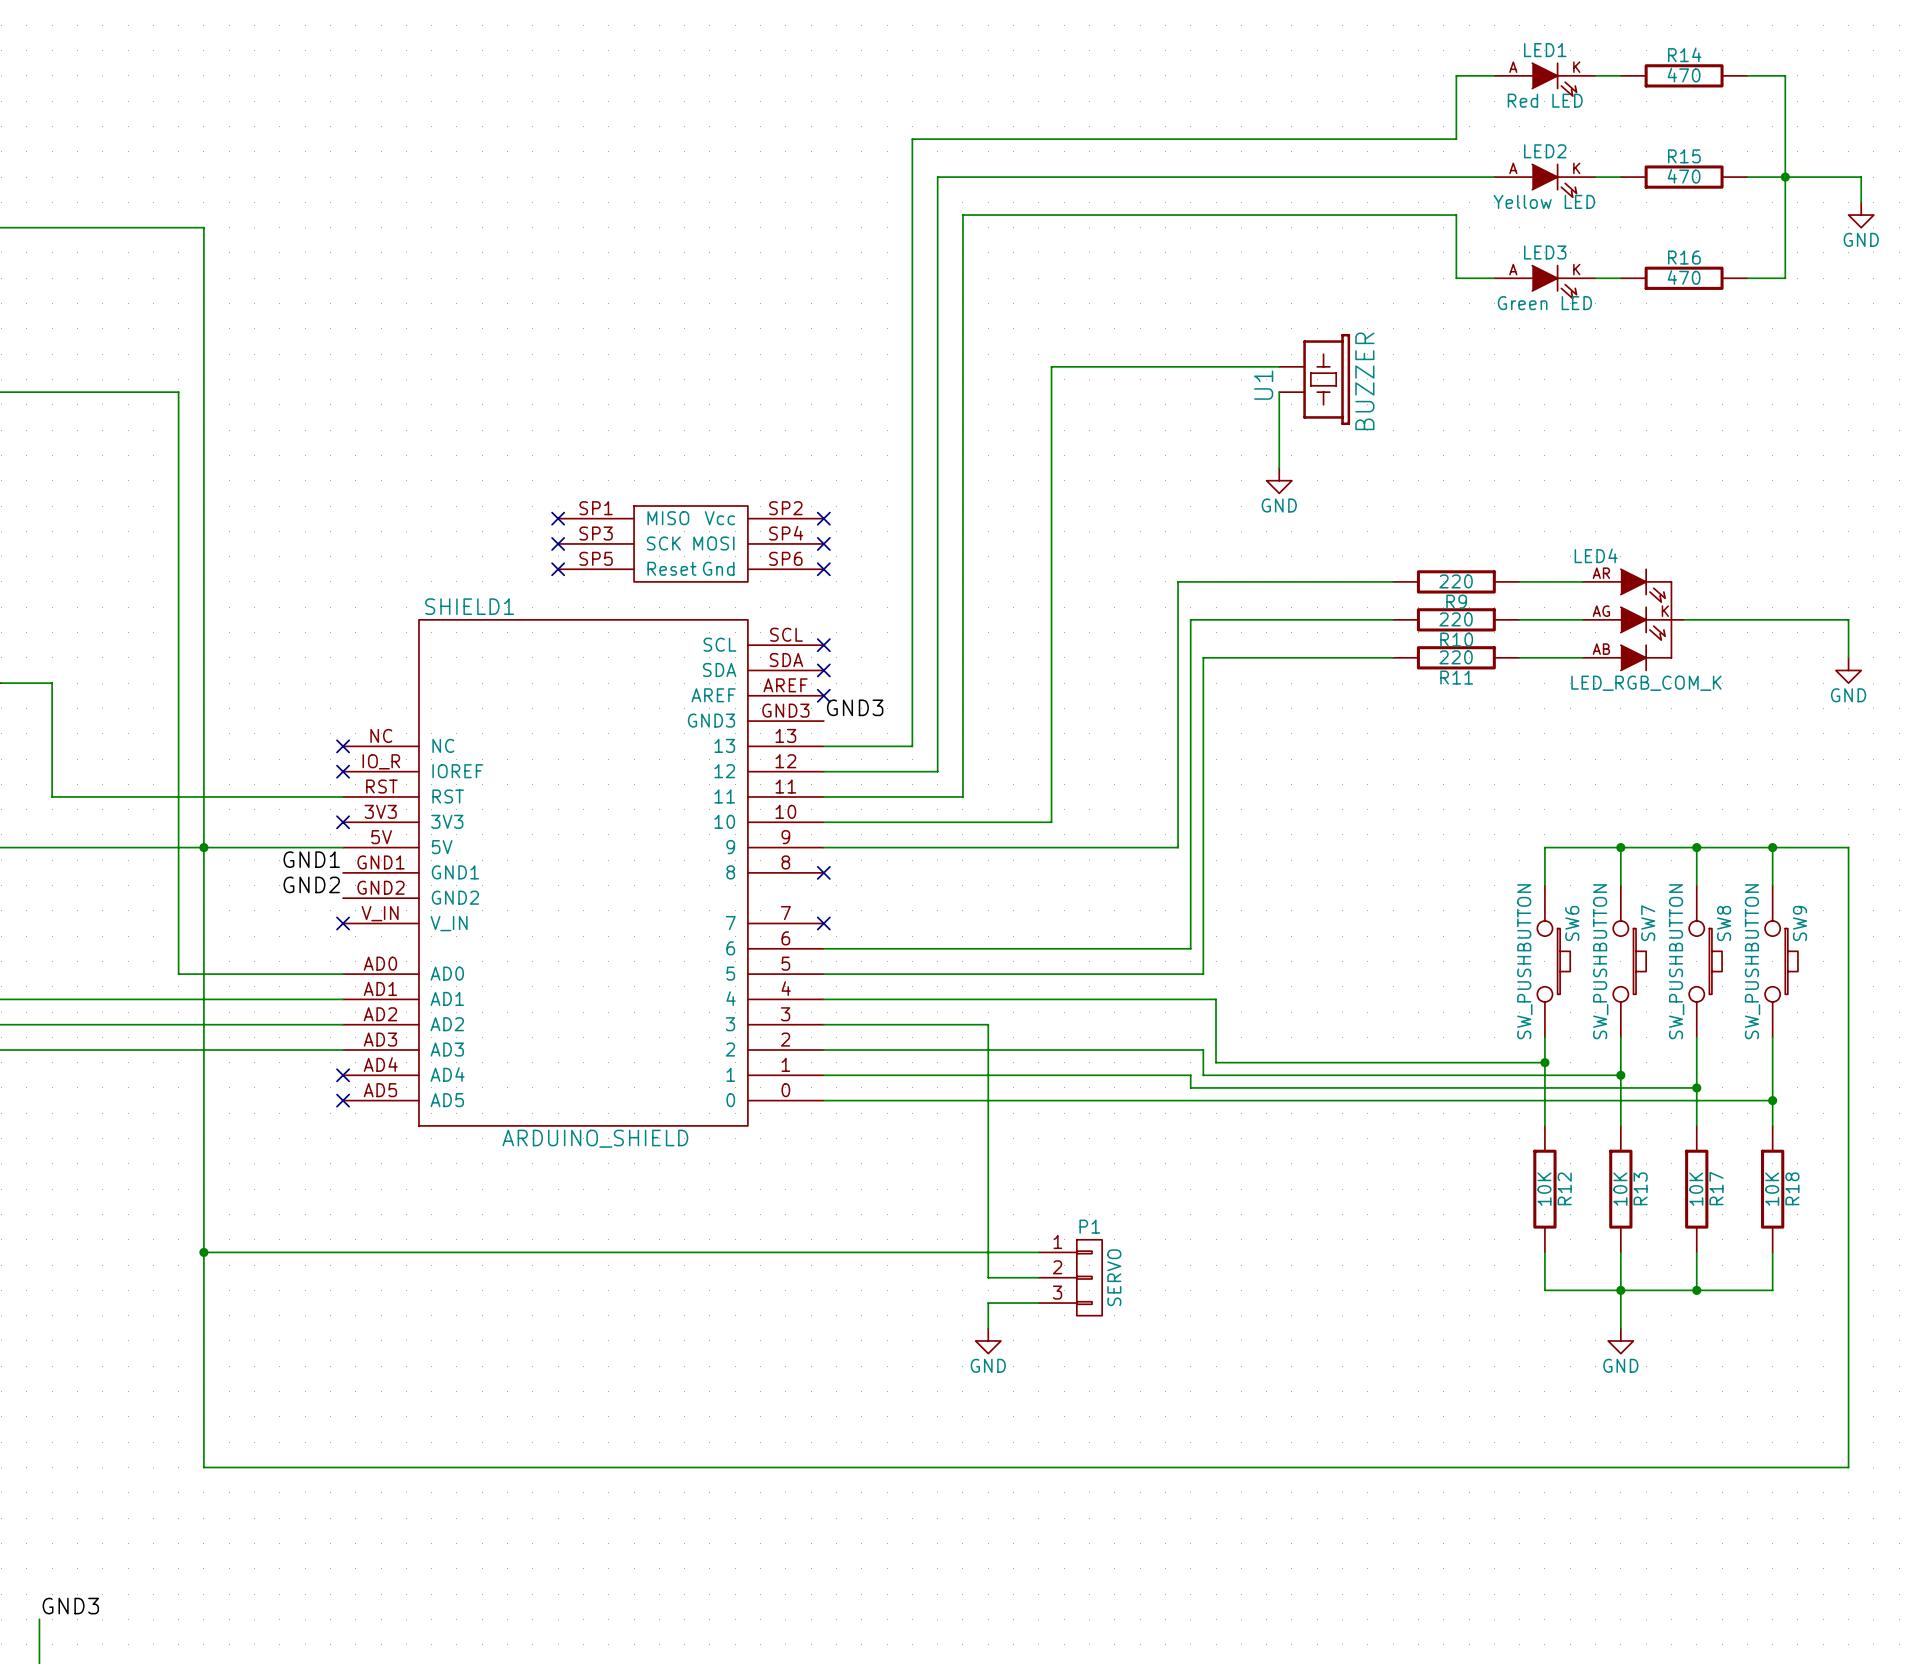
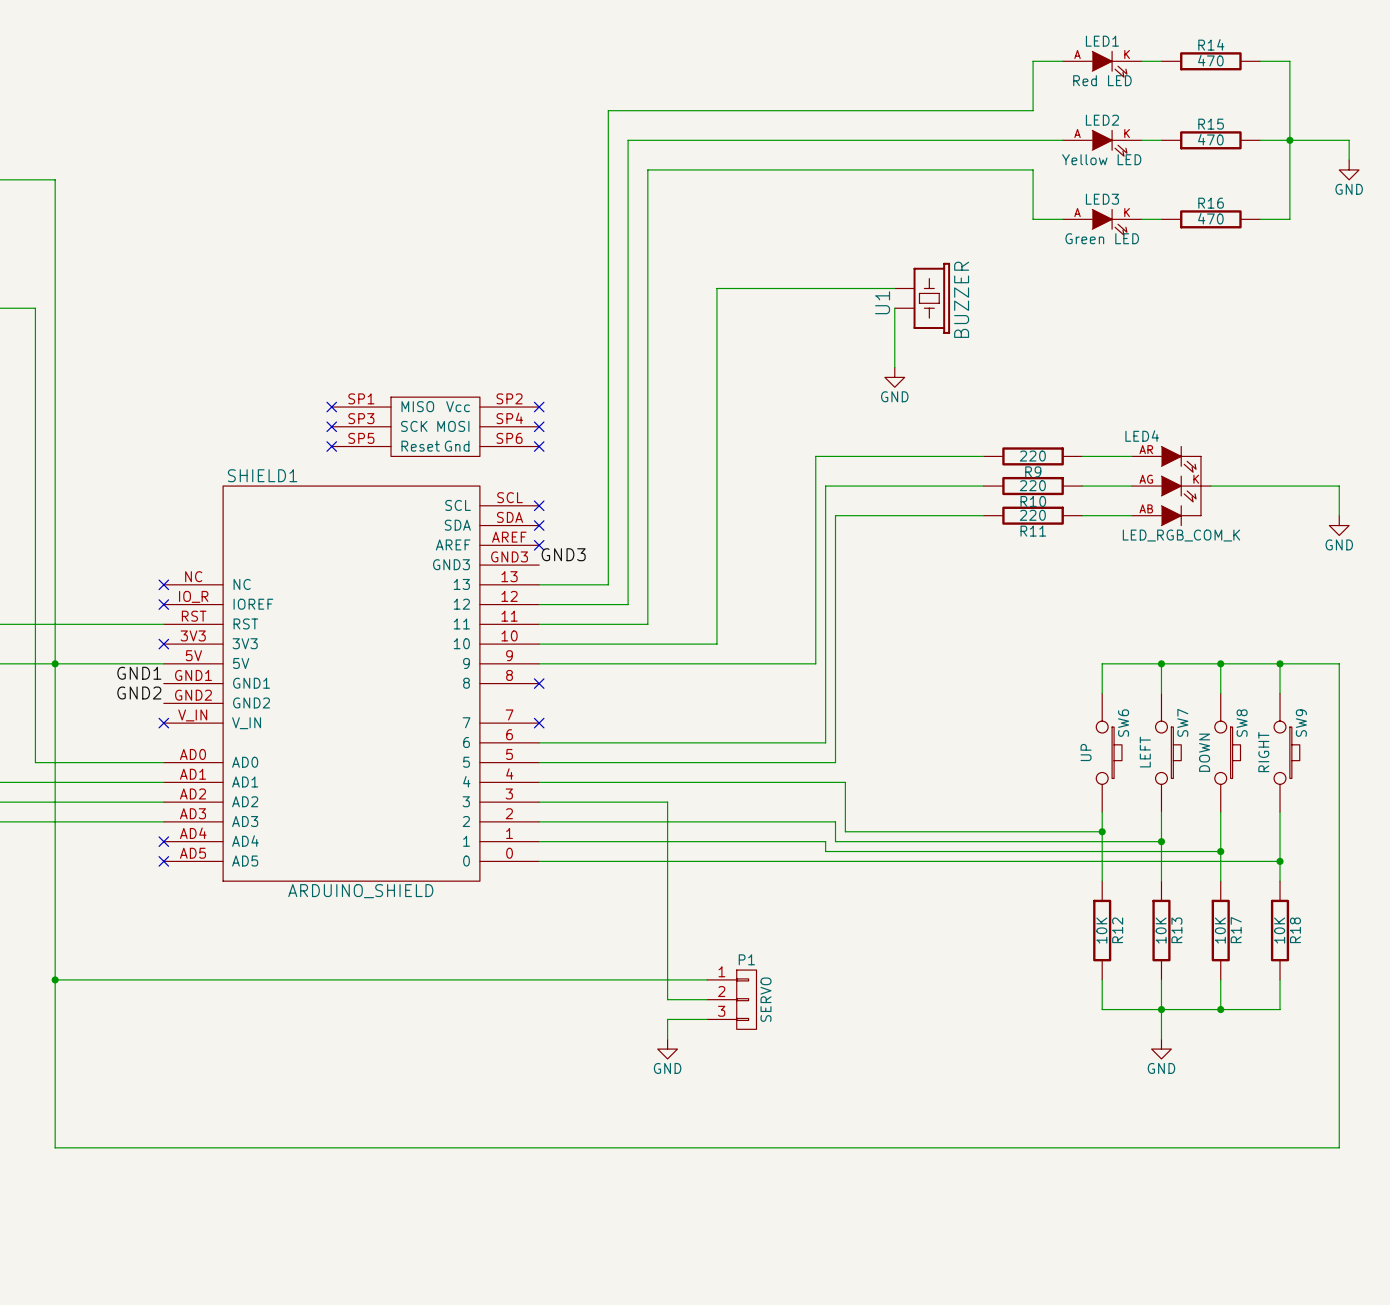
SW6 value: SW_PUSHBUTTON (1524, 961) -> UP (1086, 752)
SW7 value: SW_PUSHBUTTON (1600, 961) -> LEFT (1145, 752)
SW8 value: SW_PUSHBUTTON (1676, 961) -> DOWN (1204, 752)
SW9 value: SW_PUSHBUTTON (1752, 961) -> RIGHT (1263, 752)

